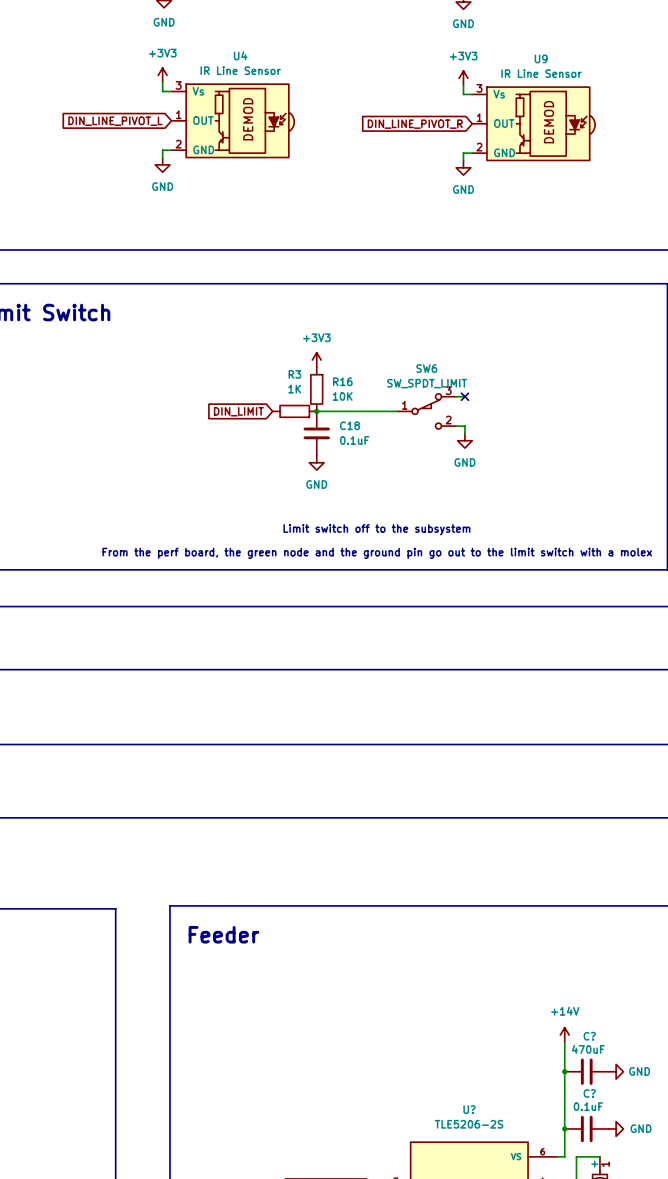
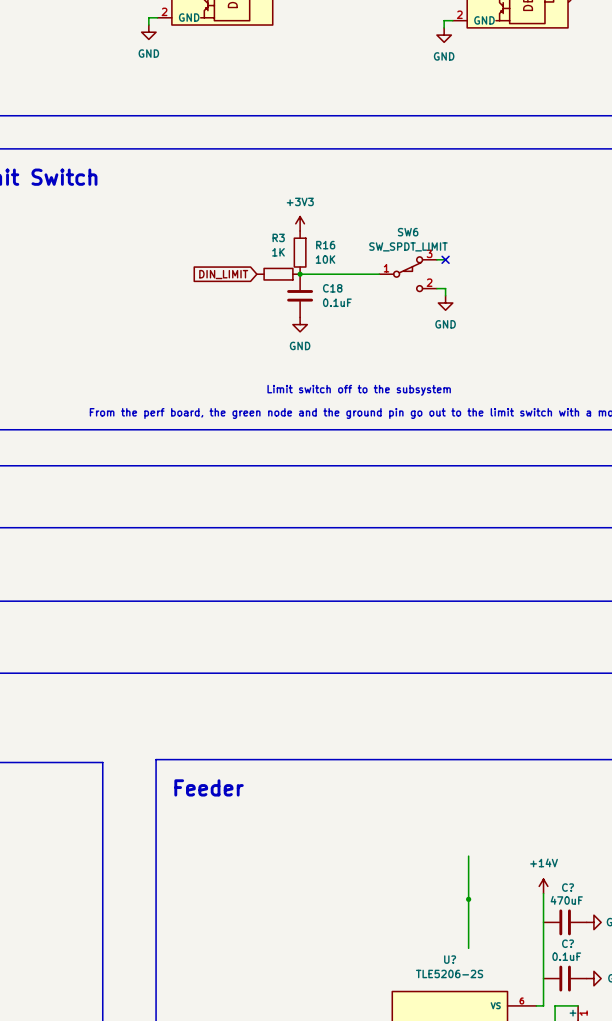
wire: none -> (468, 856) (468, 948)
junction: none -> (468, 899)
junction: (564, 1071) -> none
junction: (564, 1128) -> none

